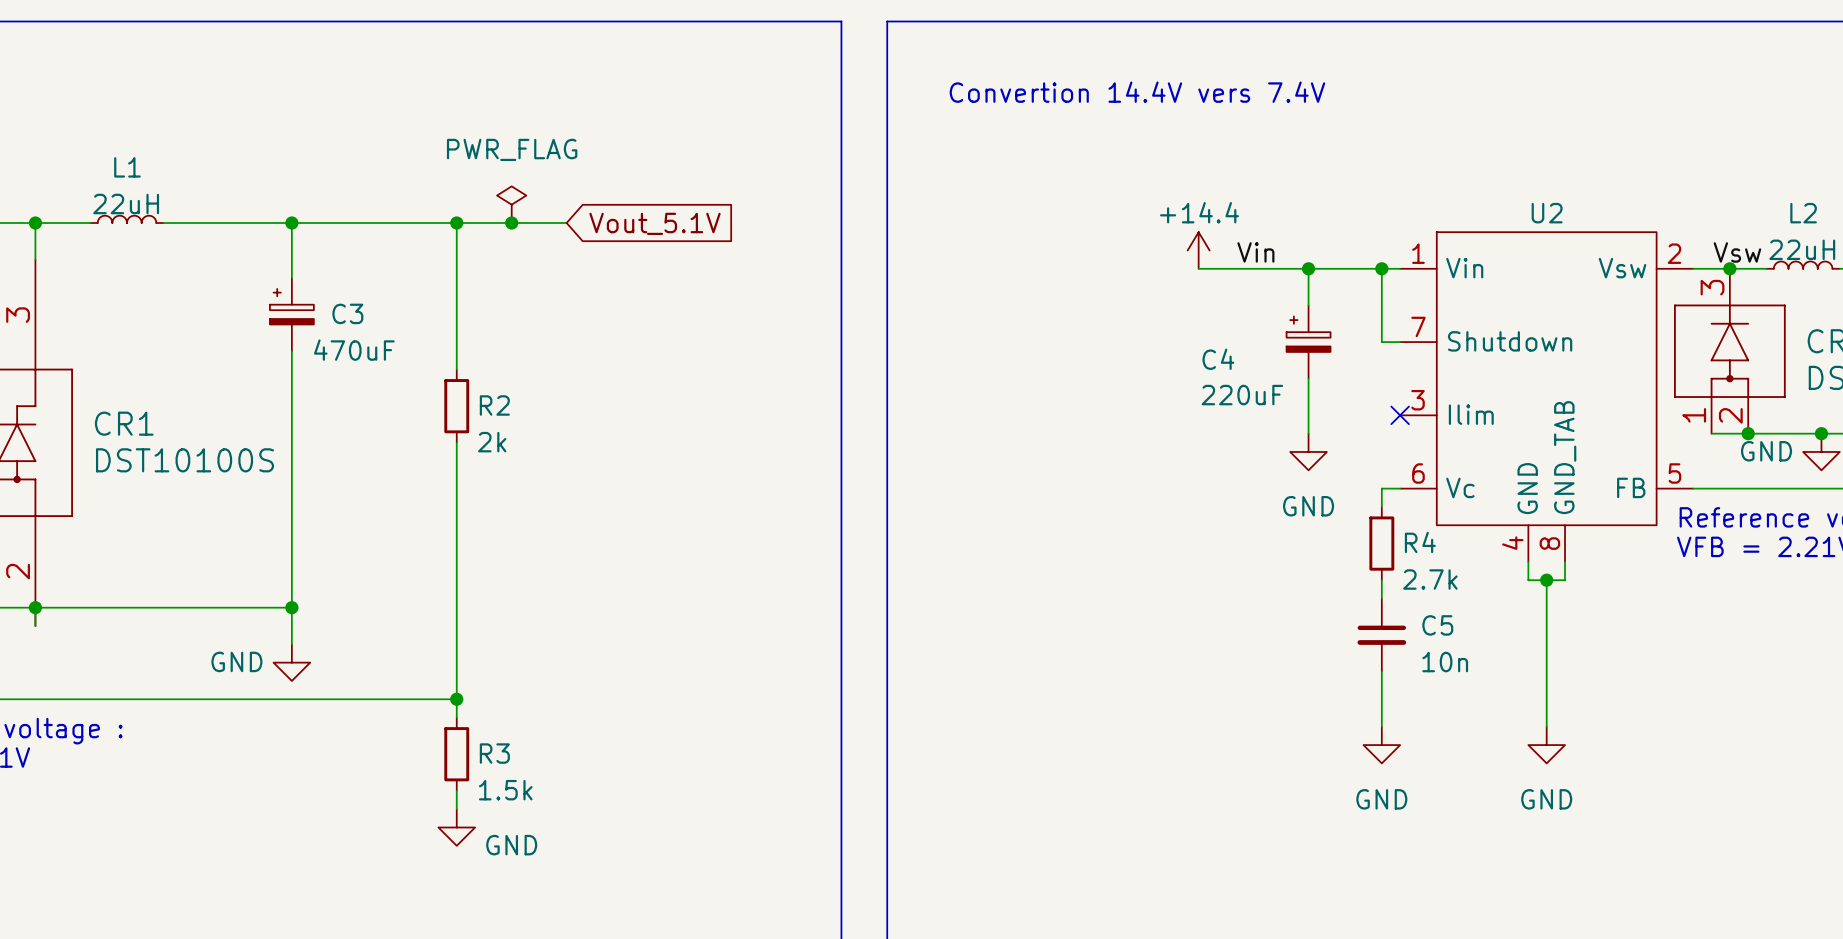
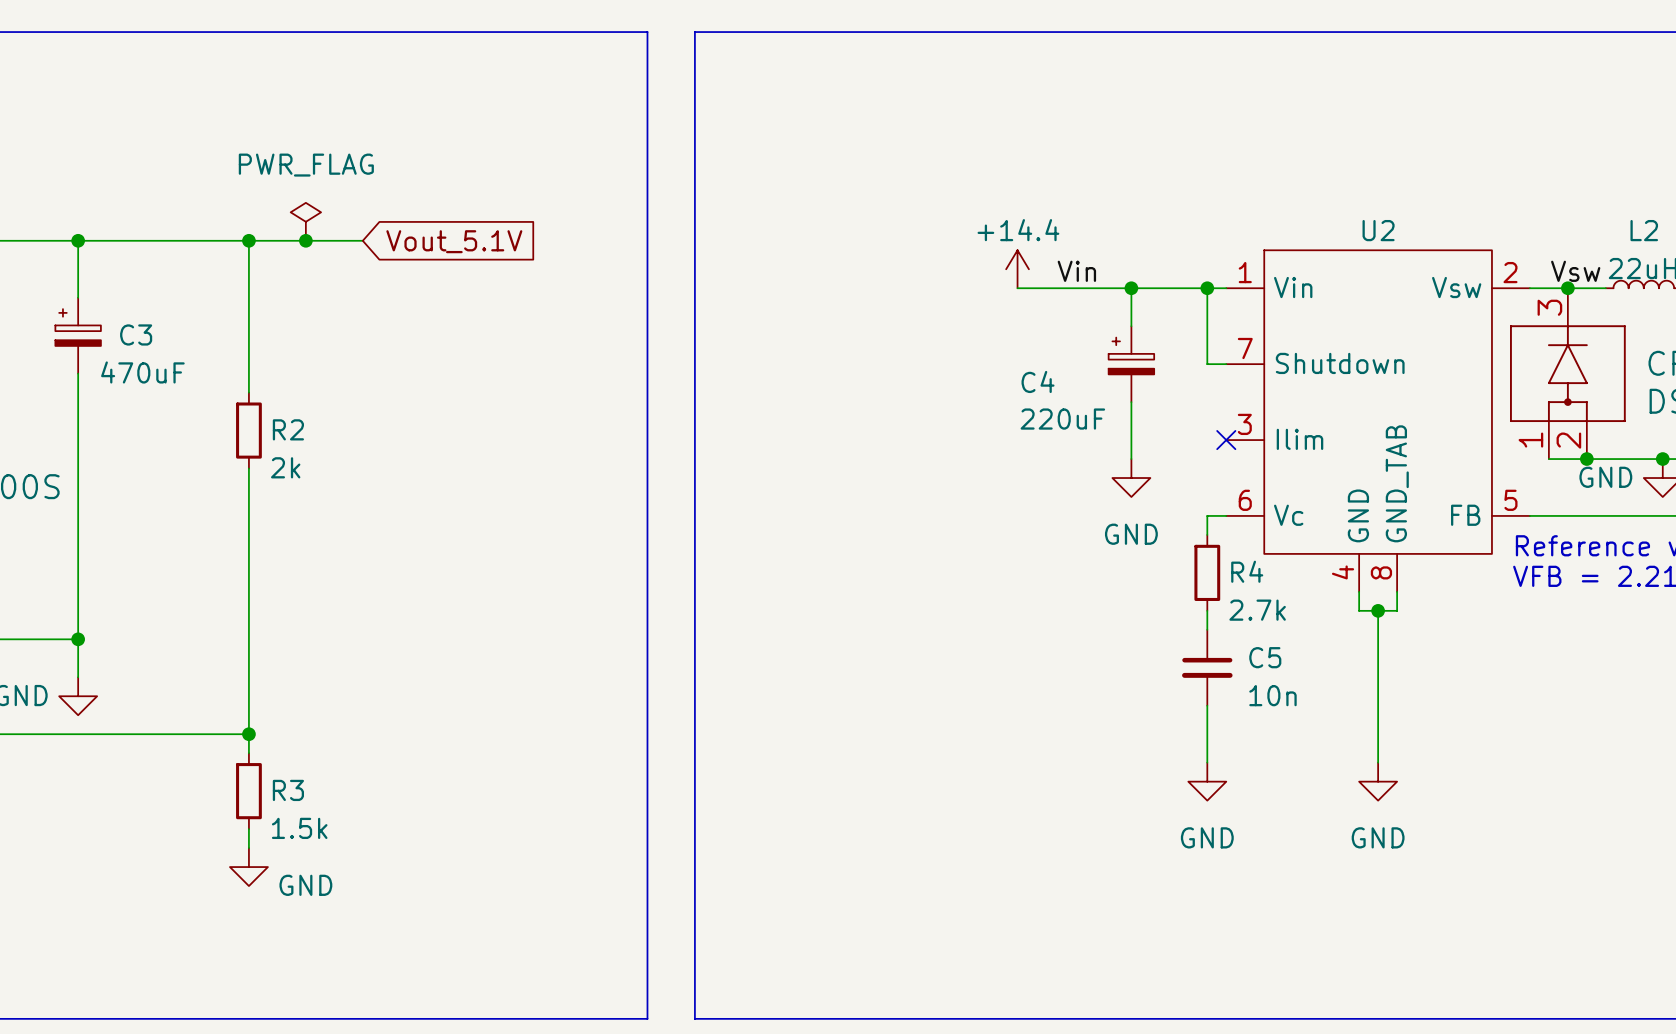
text: Convertion 14.4V vers 7.4V (1137, 92) -> none

